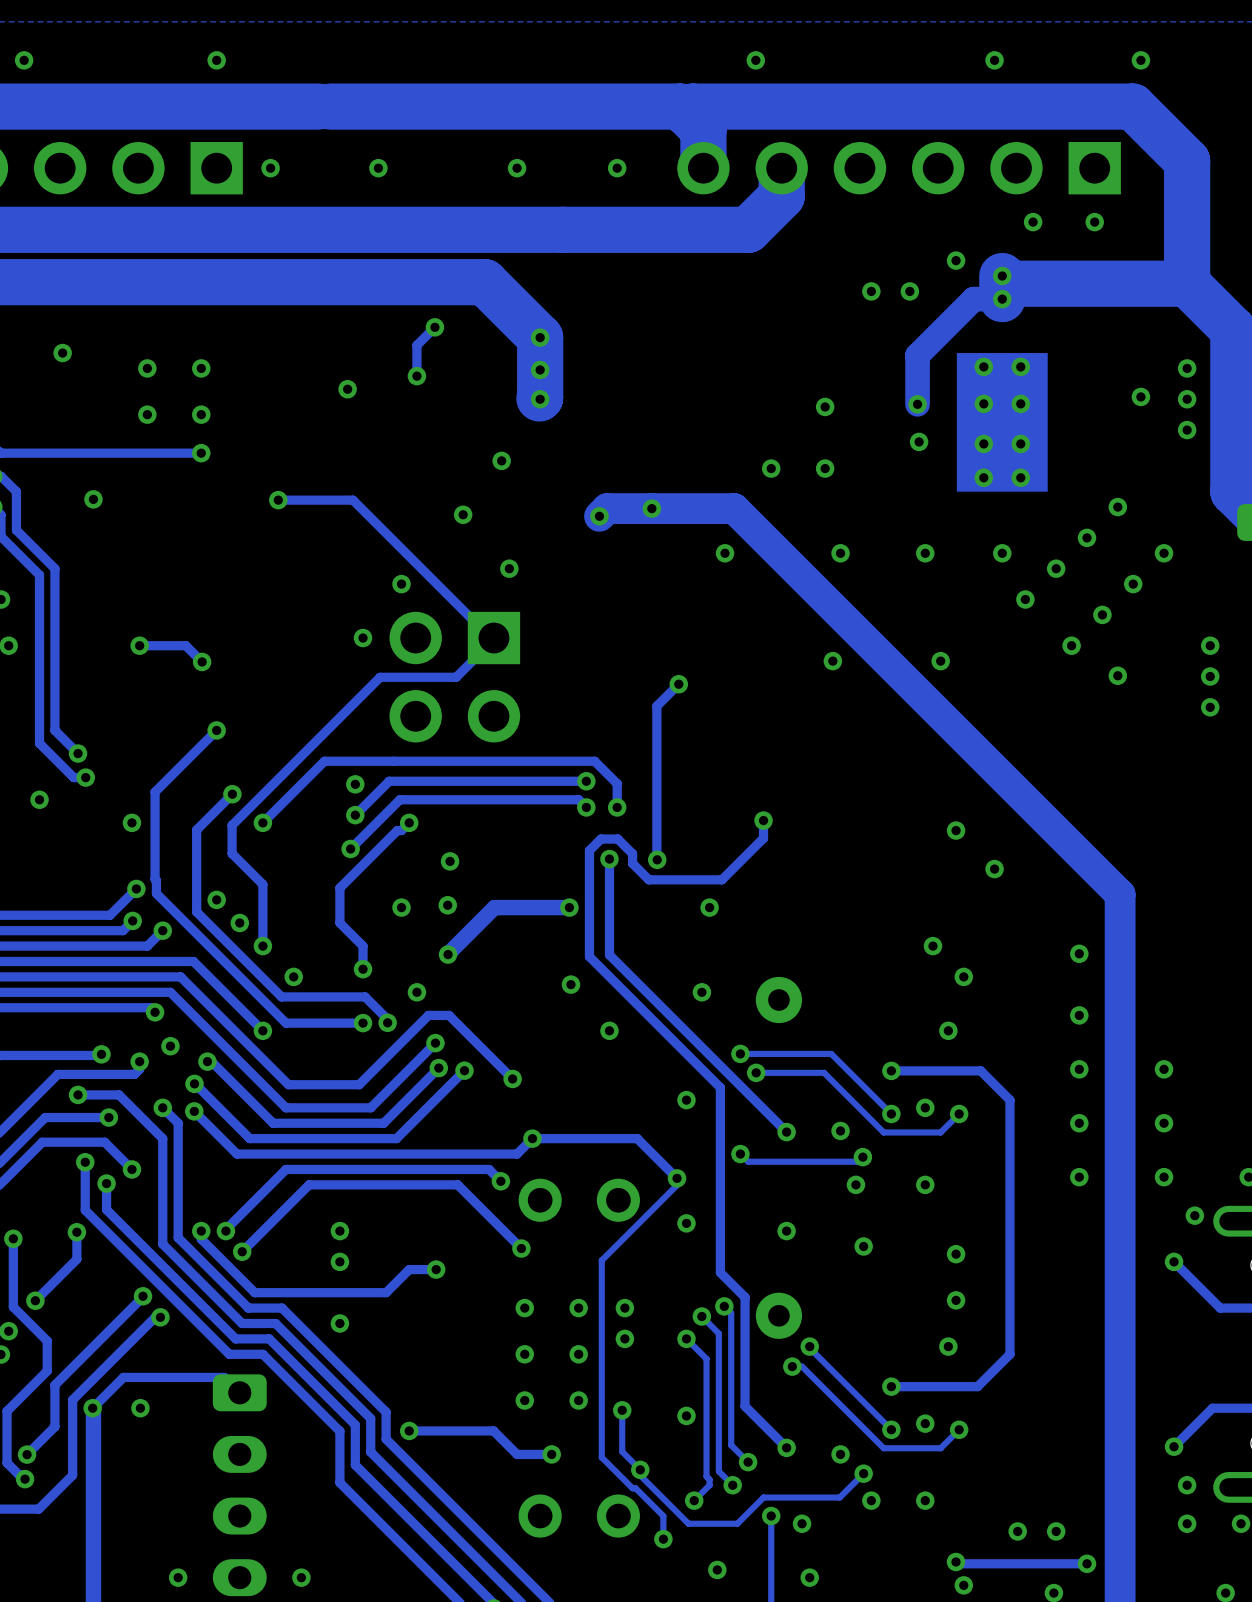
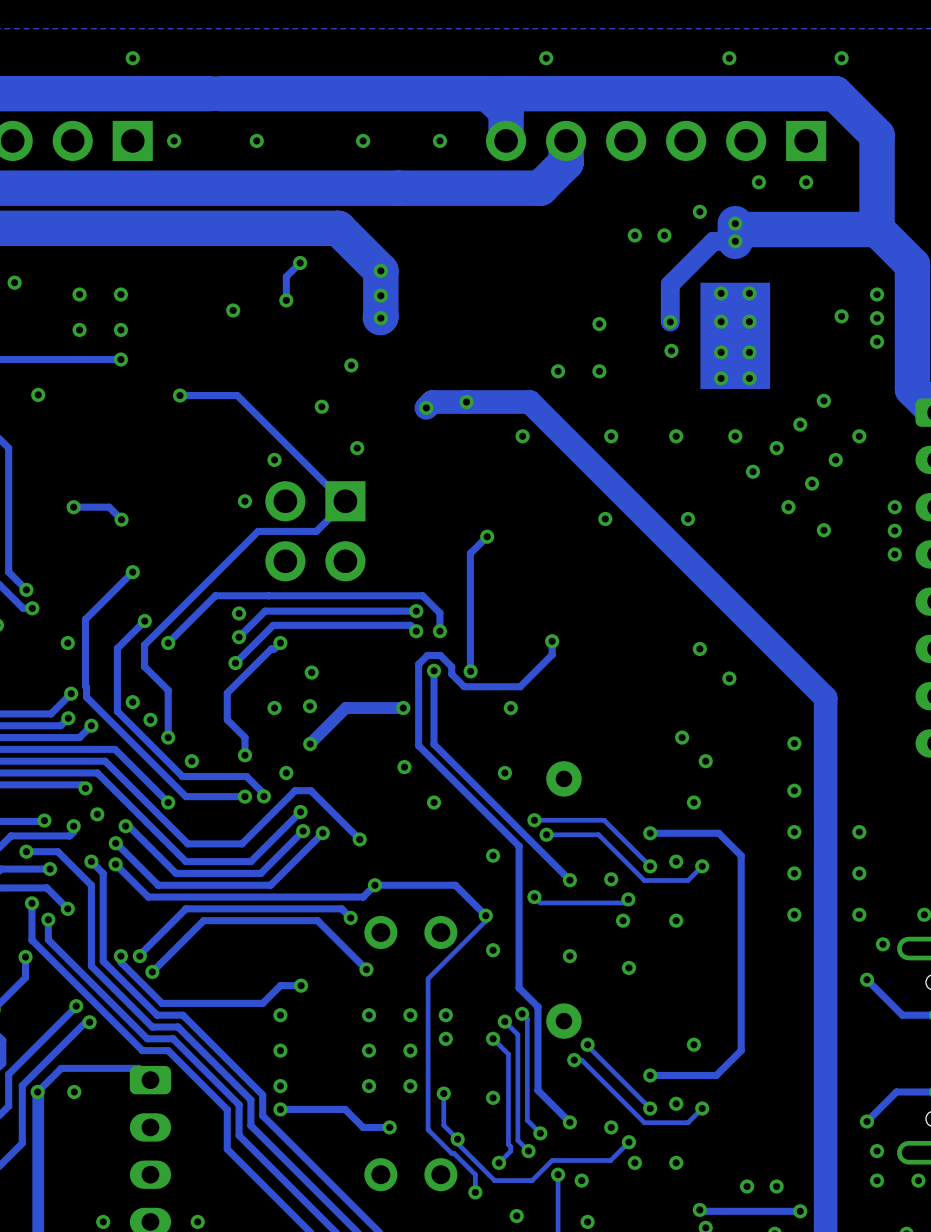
via: (339, 1231) -> none
via: (956, 1254) -> none
via: (339, 1261) -> none
via: (956, 1300) -> none
via: none -> (280, 1015)
via: (339, 1323) -> none
via: none -> (280, 1050)
via: none -> (280, 1086)

